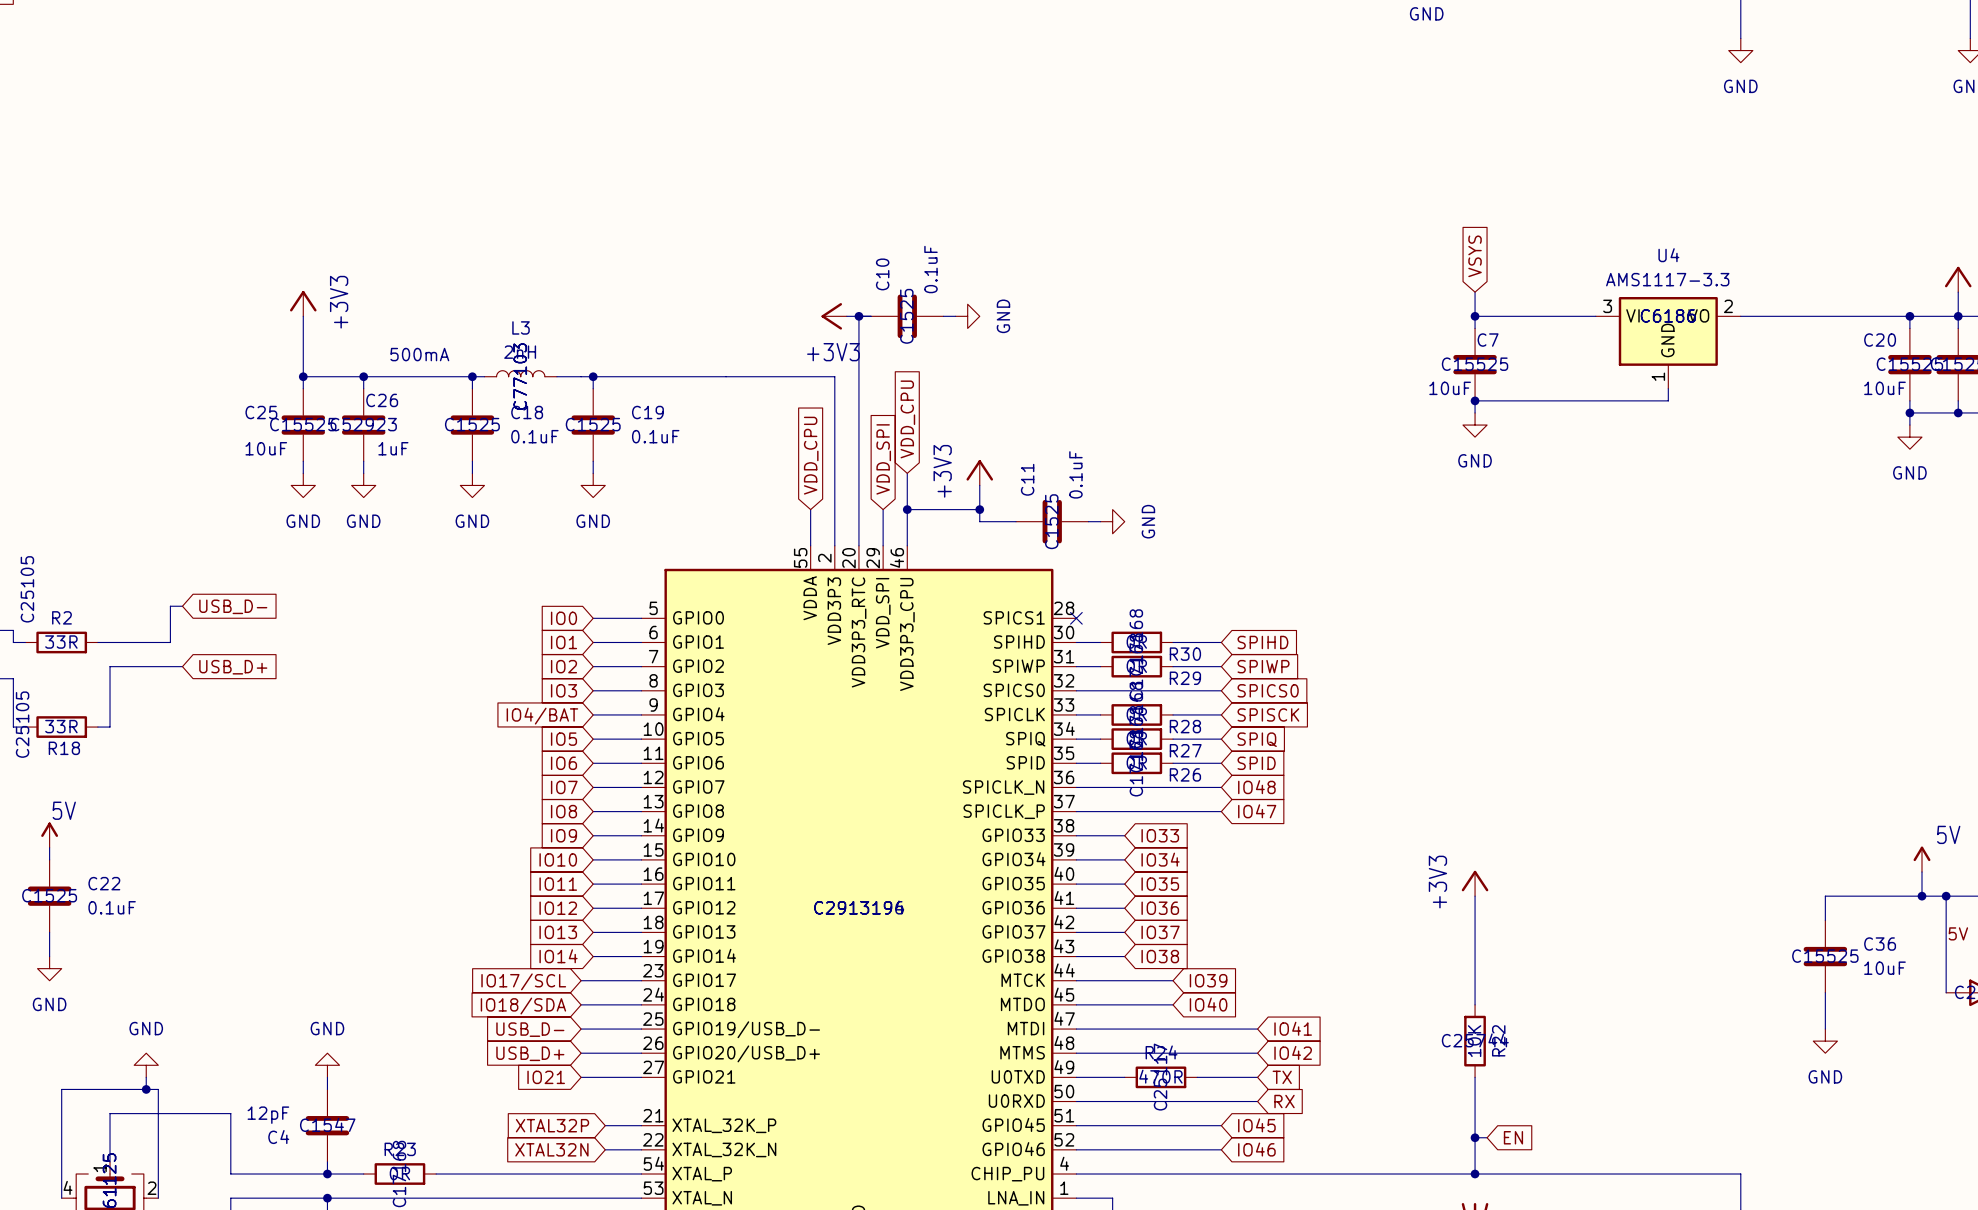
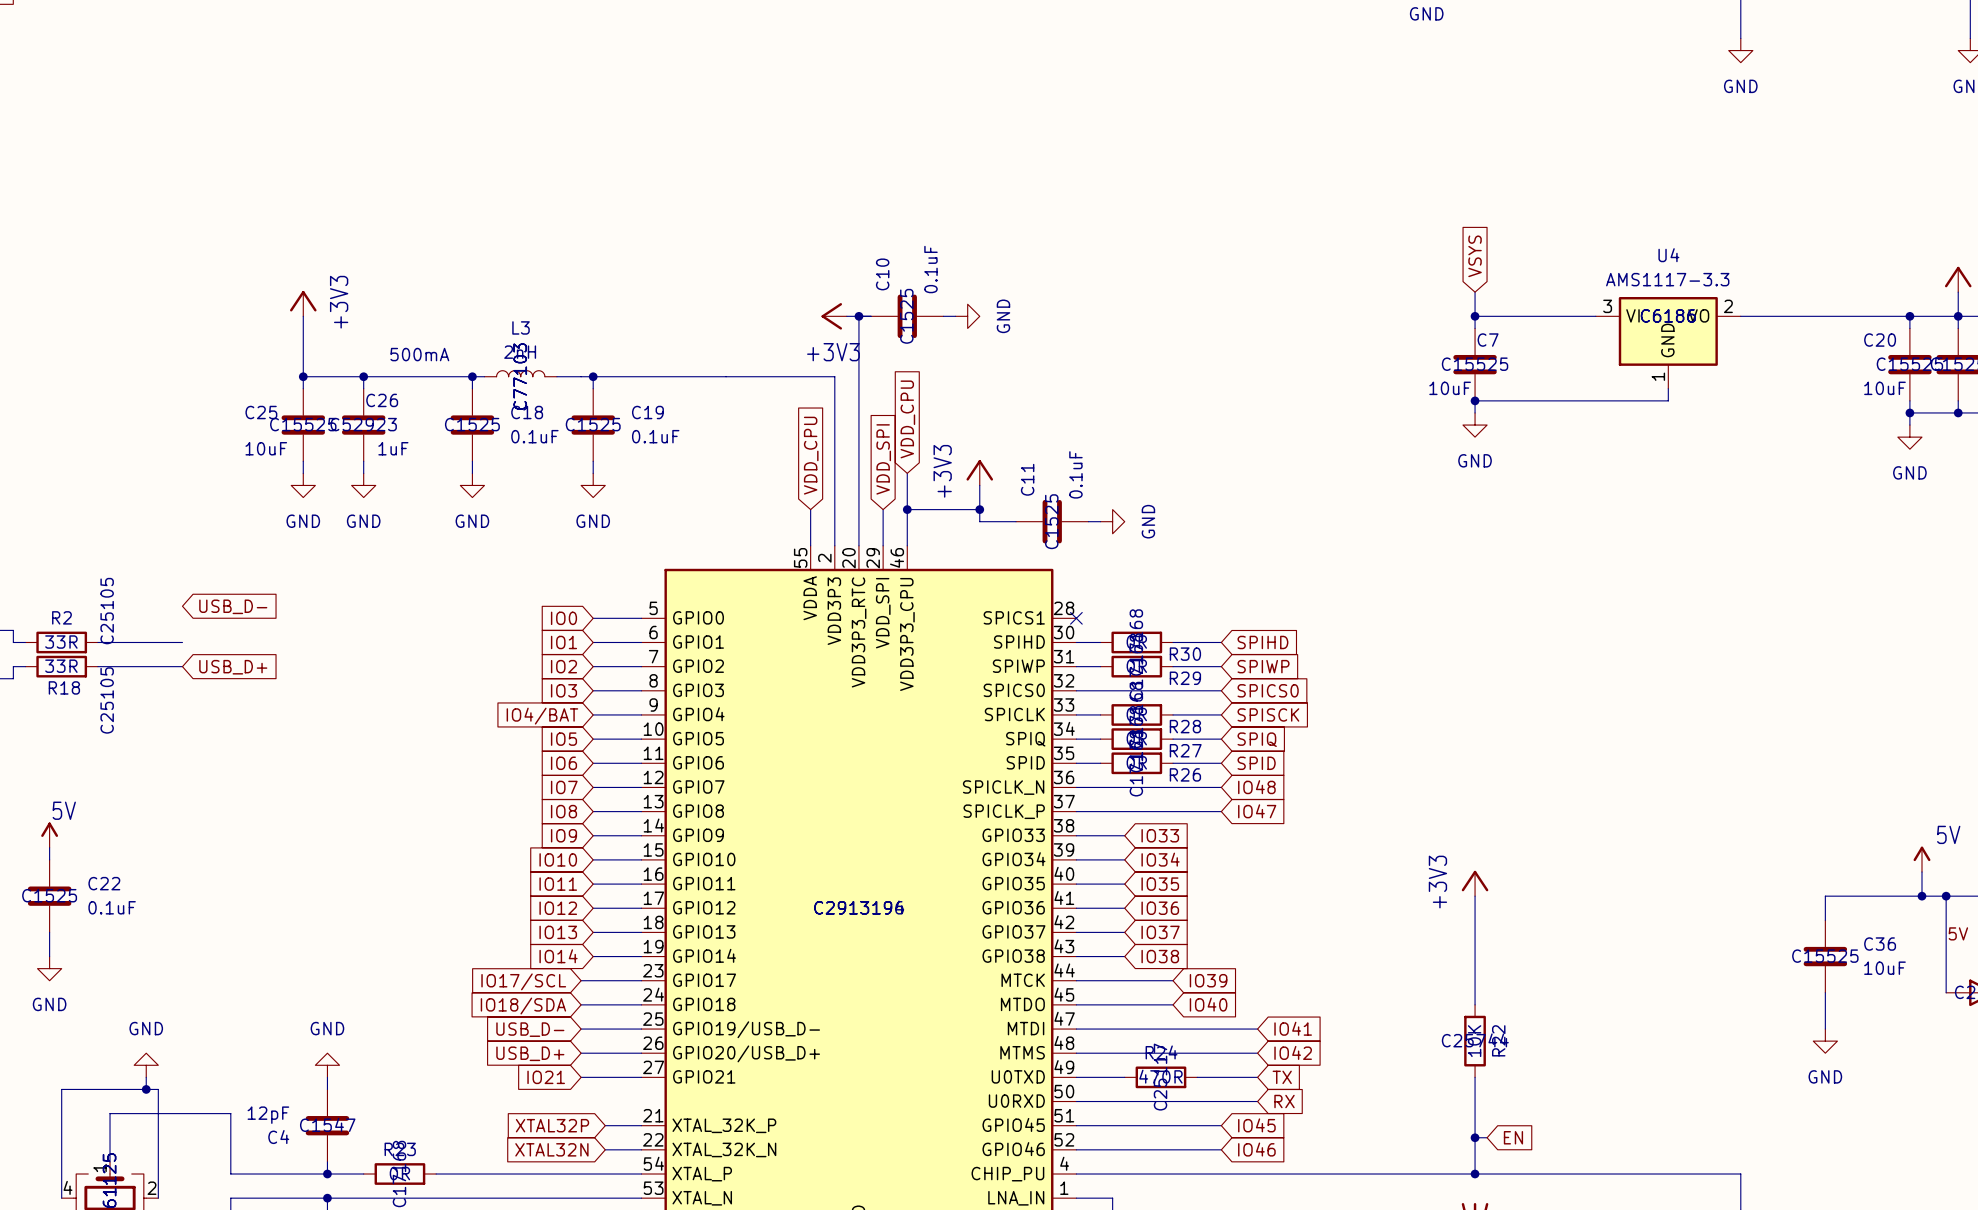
R2 text position: C25105 (27, 589) -> C25105 (107, 611)
wire: (182, 606) (170, 606) (170, 642) -> (182, 642) (170, 642)
wire: (110, 666) (110, 727) (97, 727) -> (110, 666) (97, 666)
wire: (13, 678) (13, 727) (25, 727) -> (13, 678) (13, 666) (25, 666)
R18 text position: C25105 (22, 724) -> C25105 (107, 700)
R18 position: (61, 727) -> (61, 666)

